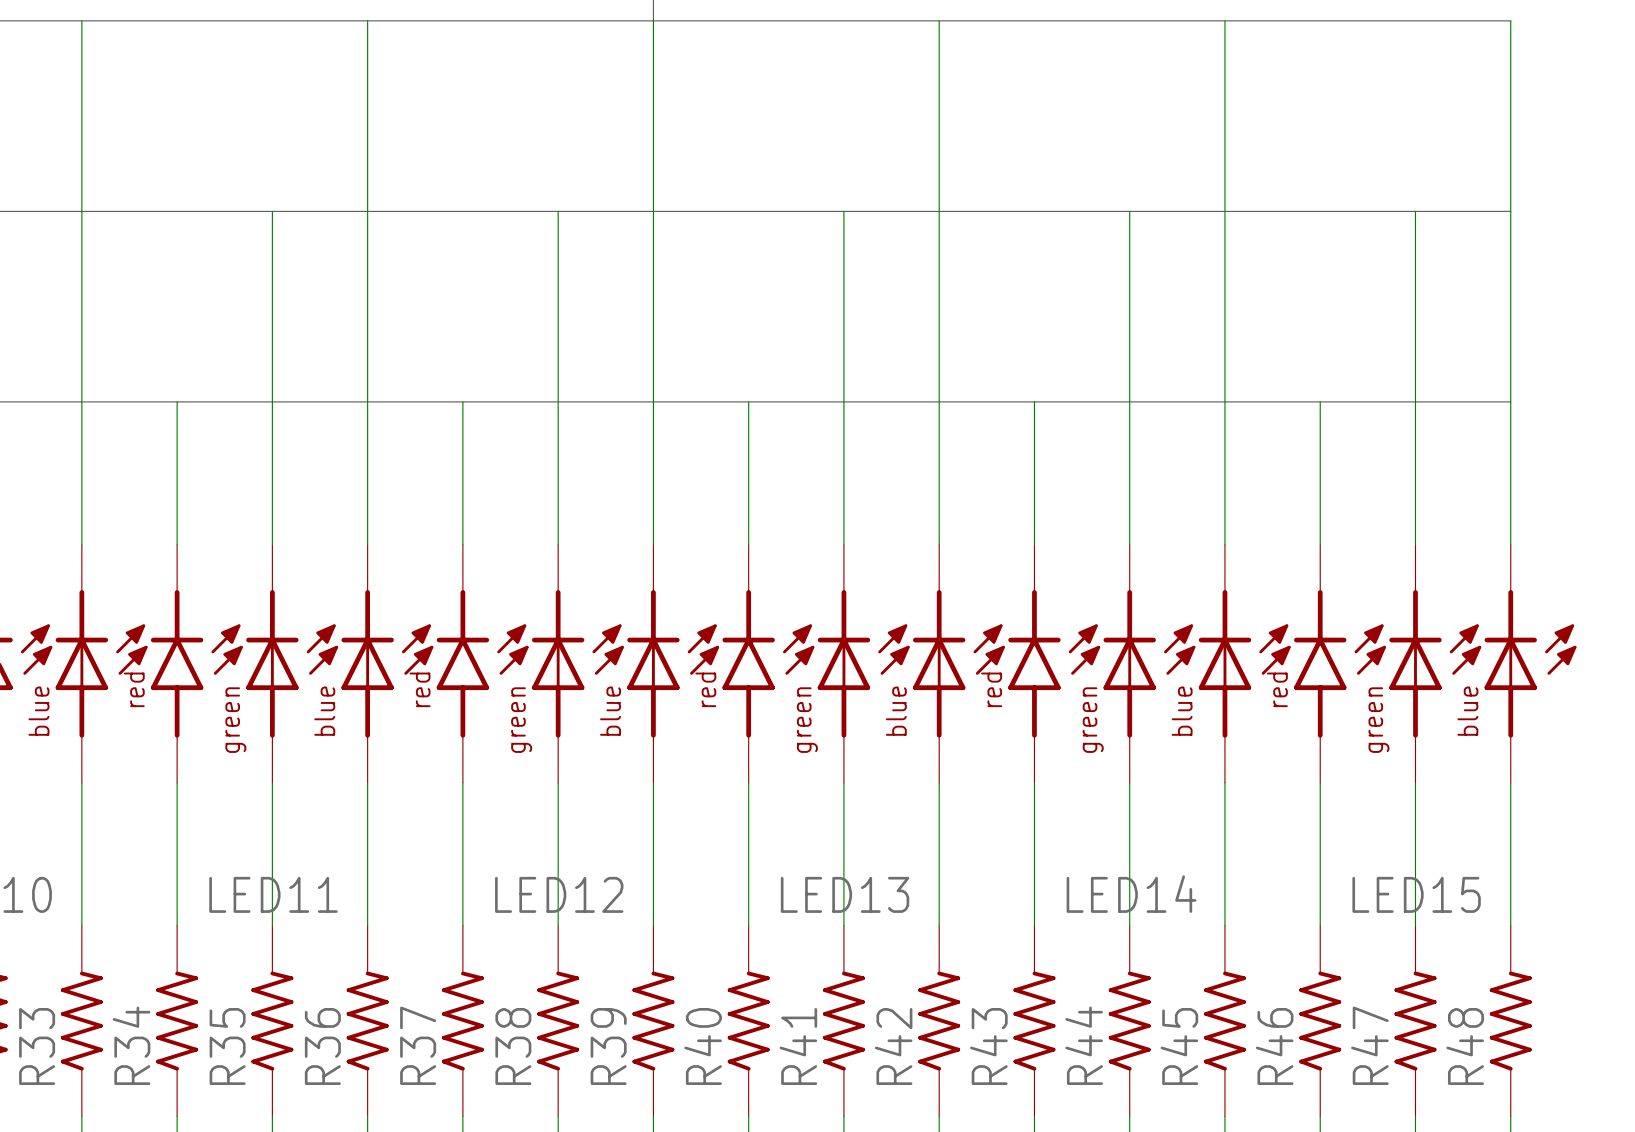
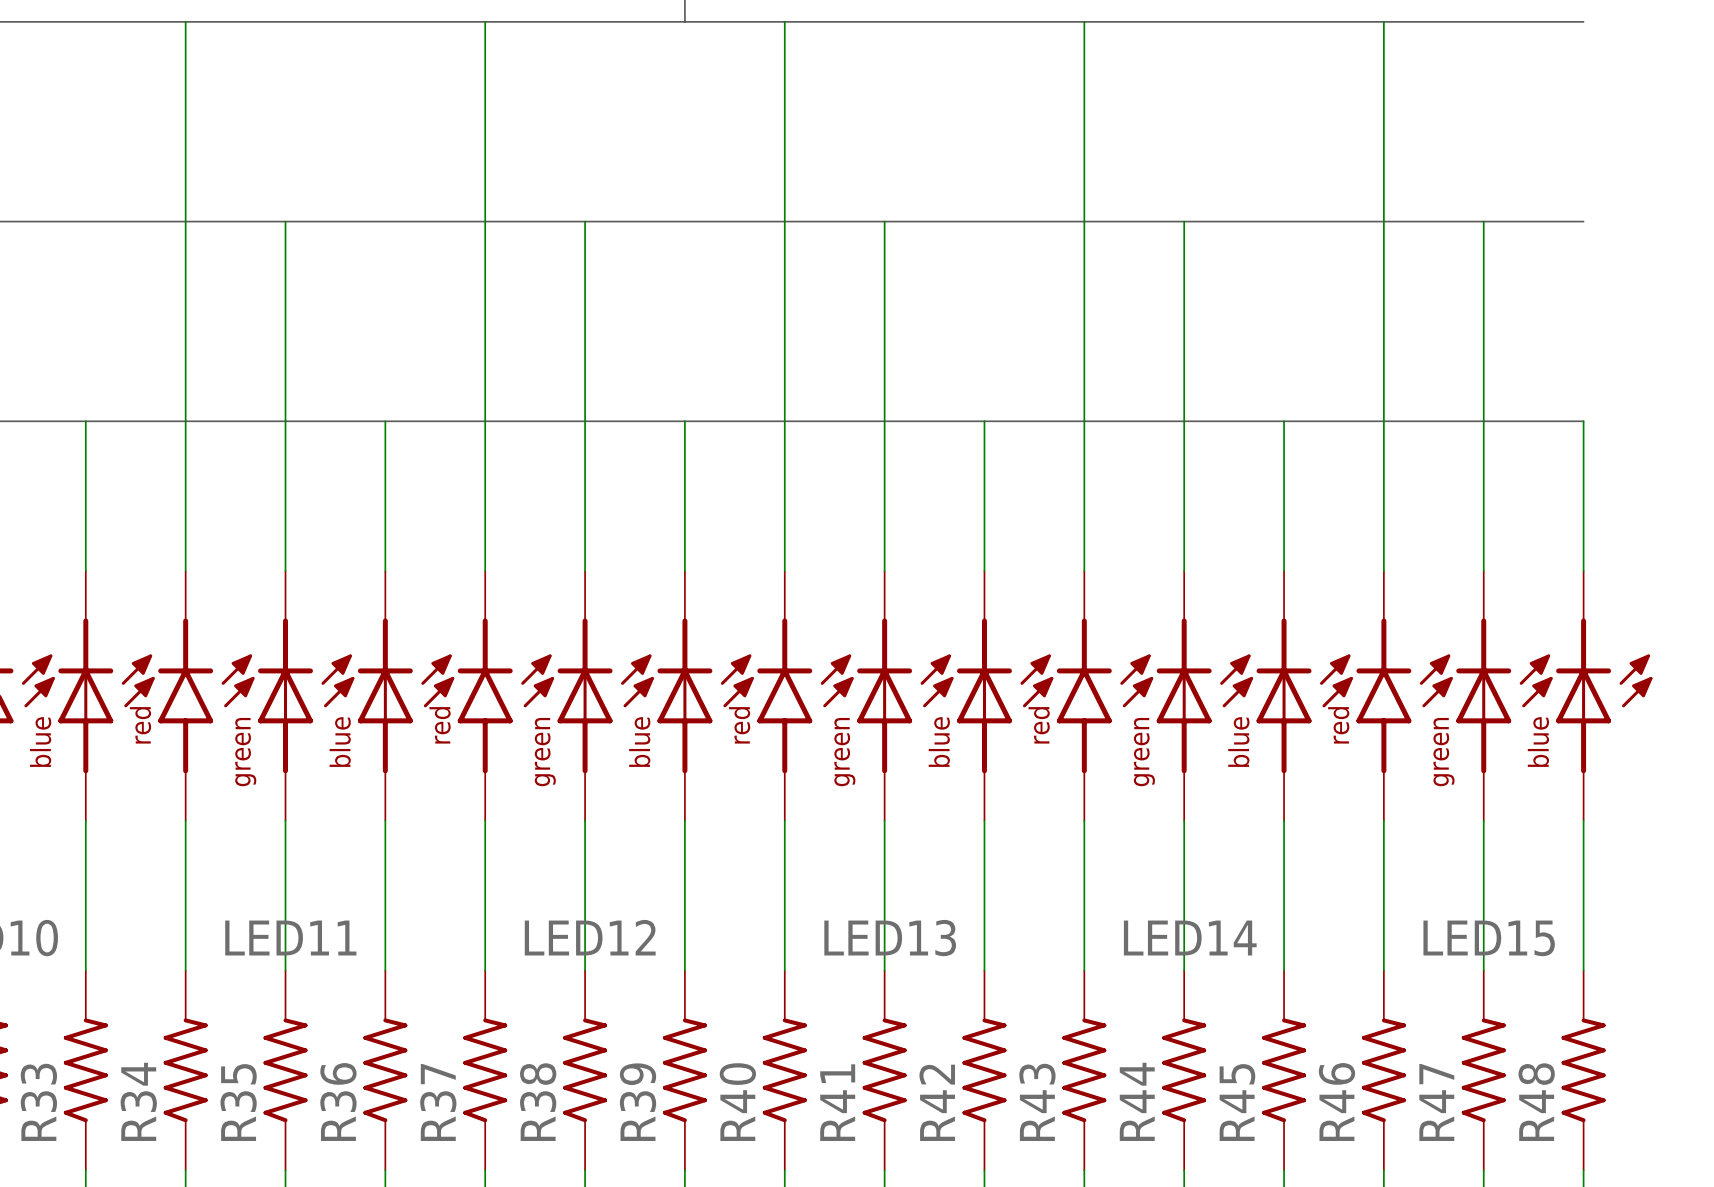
wire: (81, 20) (81, 401) -> (185, 21) (185, 421)
wire: (367, 20) (367, 401) -> (485, 21) (485, 421)
wire: (653, 20) (653, 401) -> (784, 21) (784, 421)
wire: (939, 20) (939, 401) -> (1084, 21) (1084, 421)
wire: (1224, 20) (1224, 401) -> (1383, 21) (1383, 421)
wire: (1510, 20) (1510, 401) -> none

